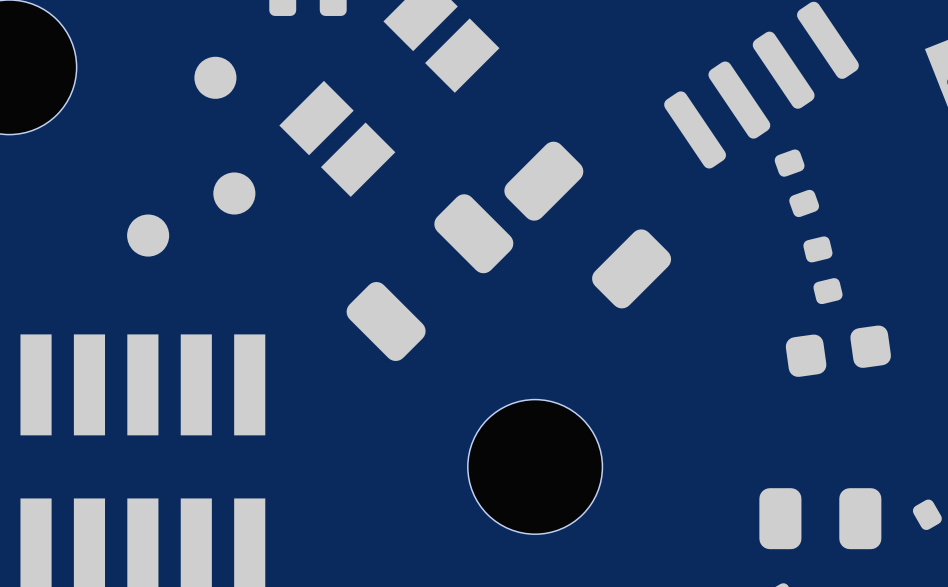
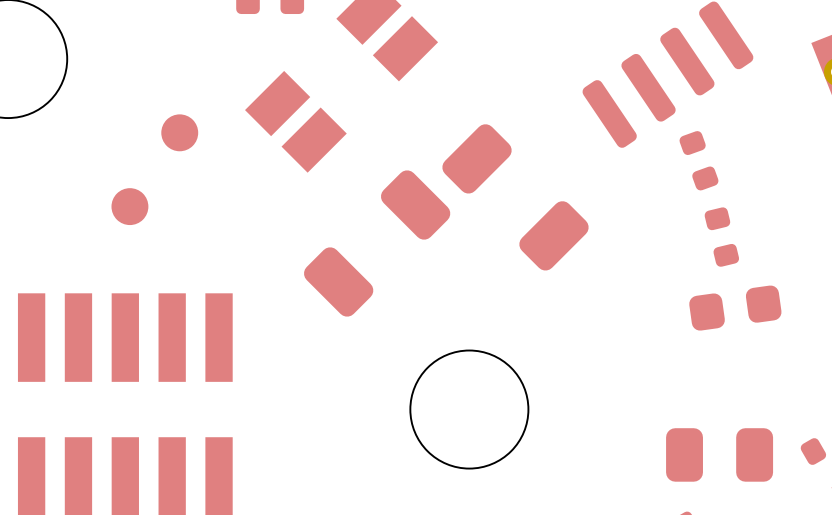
part: (215, 77) -> none
part: none -> (179, 132)
part: (234, 193) -> none

